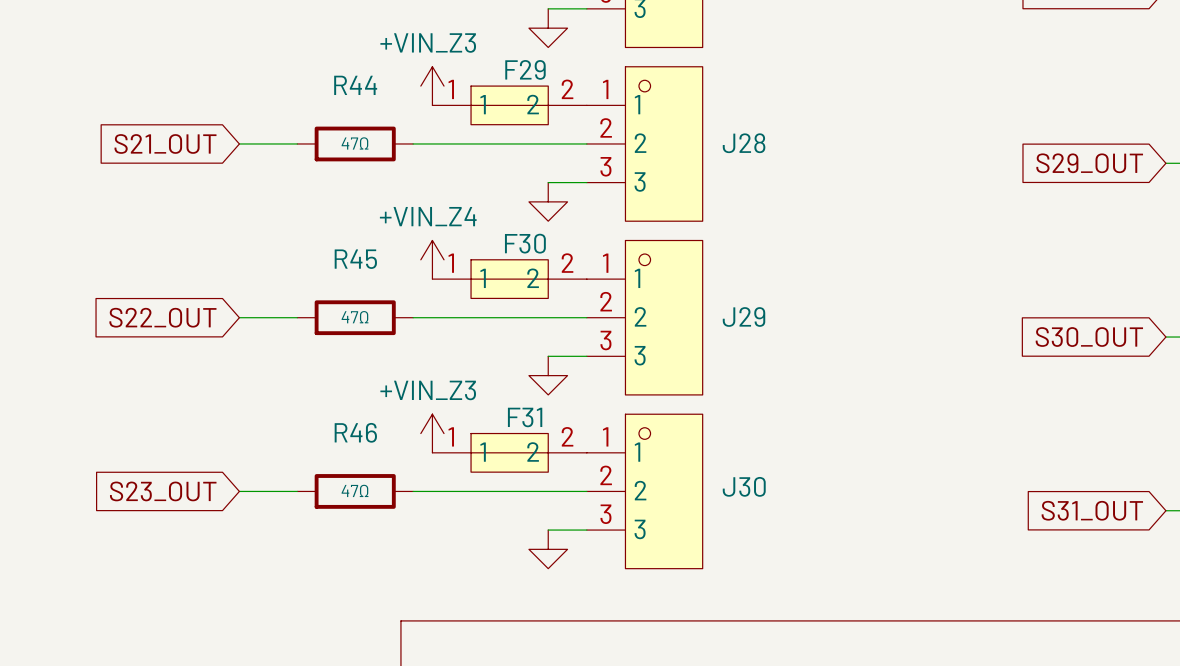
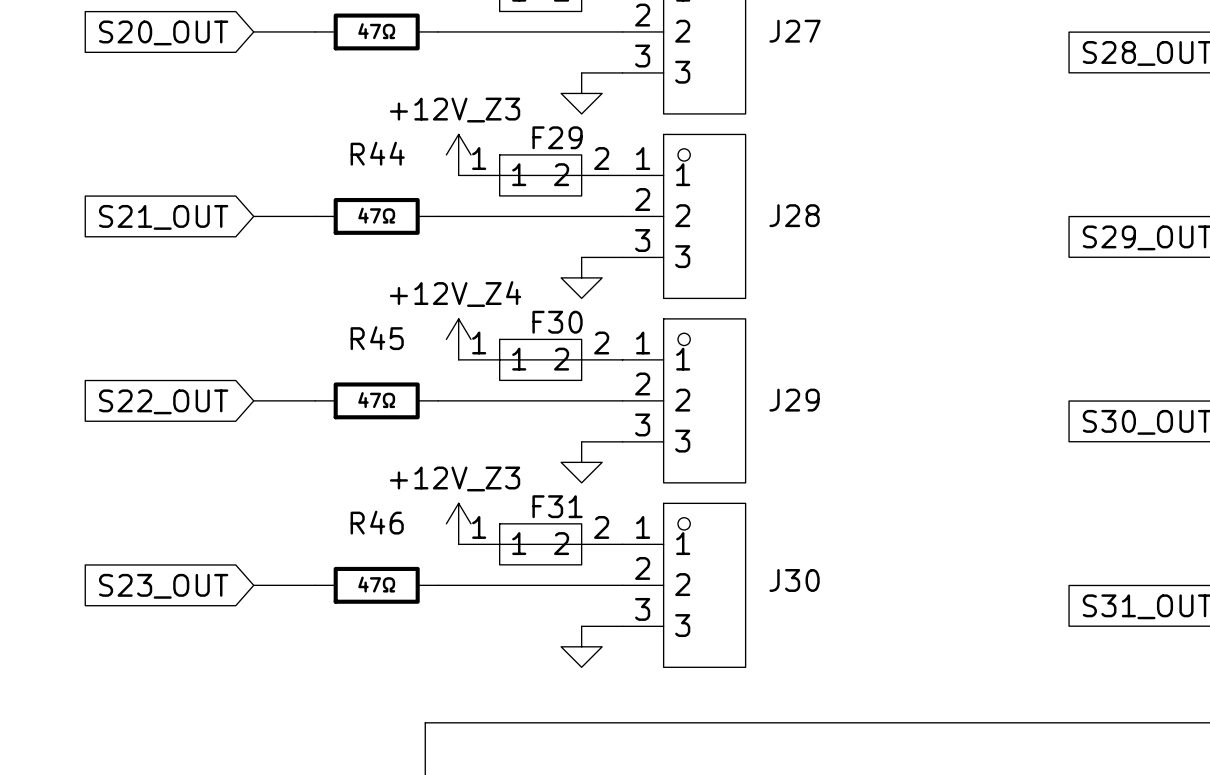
power symbol: +VIN_Z3 (432, 86) -> +12V_Z3 (458, 154)
power symbol: +VIN_Z4 (432, 259) -> +12V_Z4 (458, 339)
power symbol: +VIN_Z3 (432, 433) -> +12V_Z3 (458, 523)

